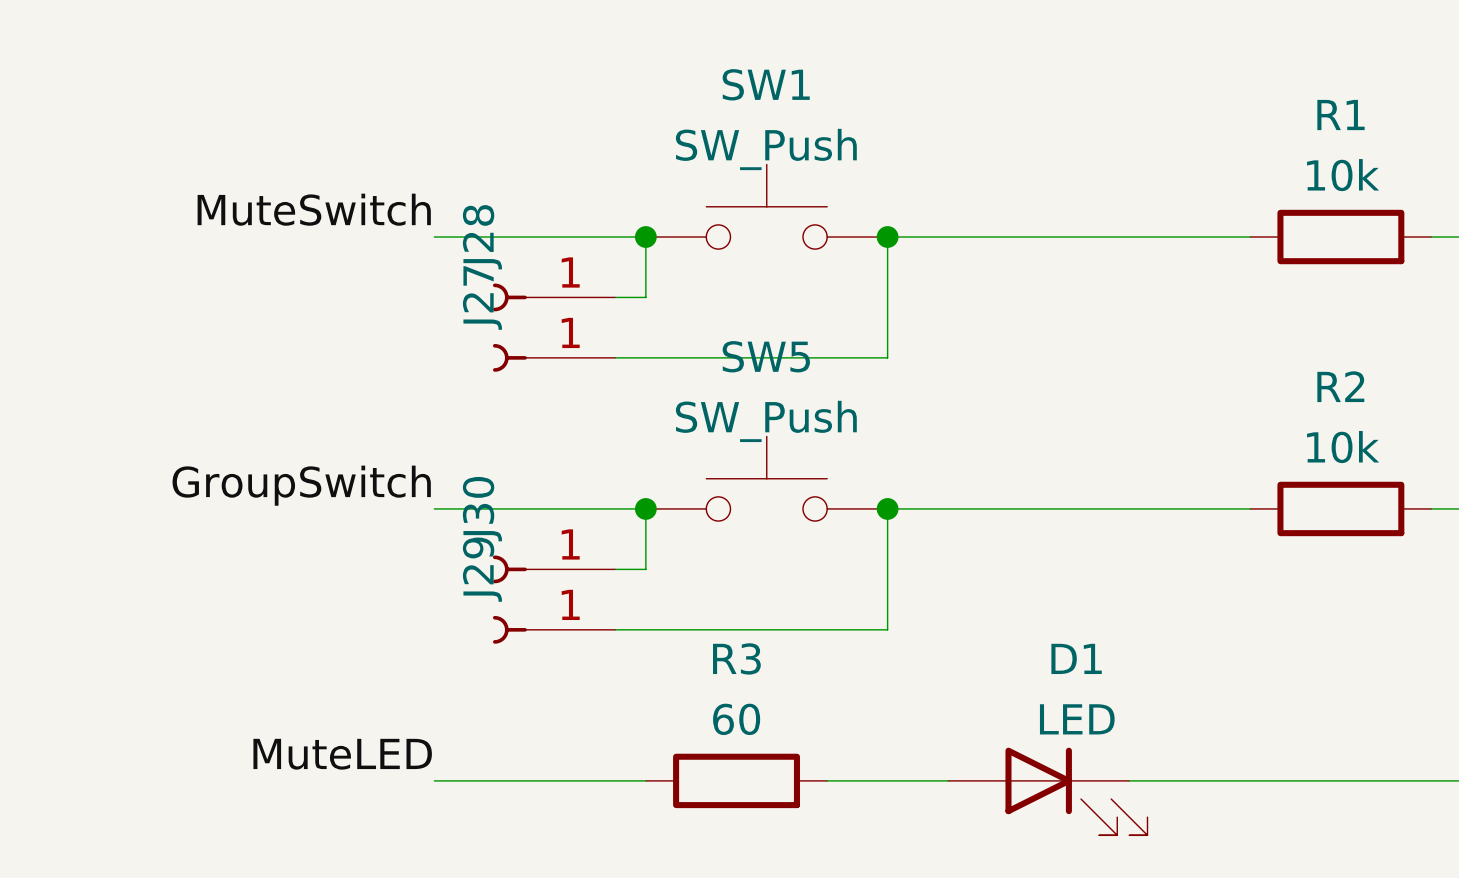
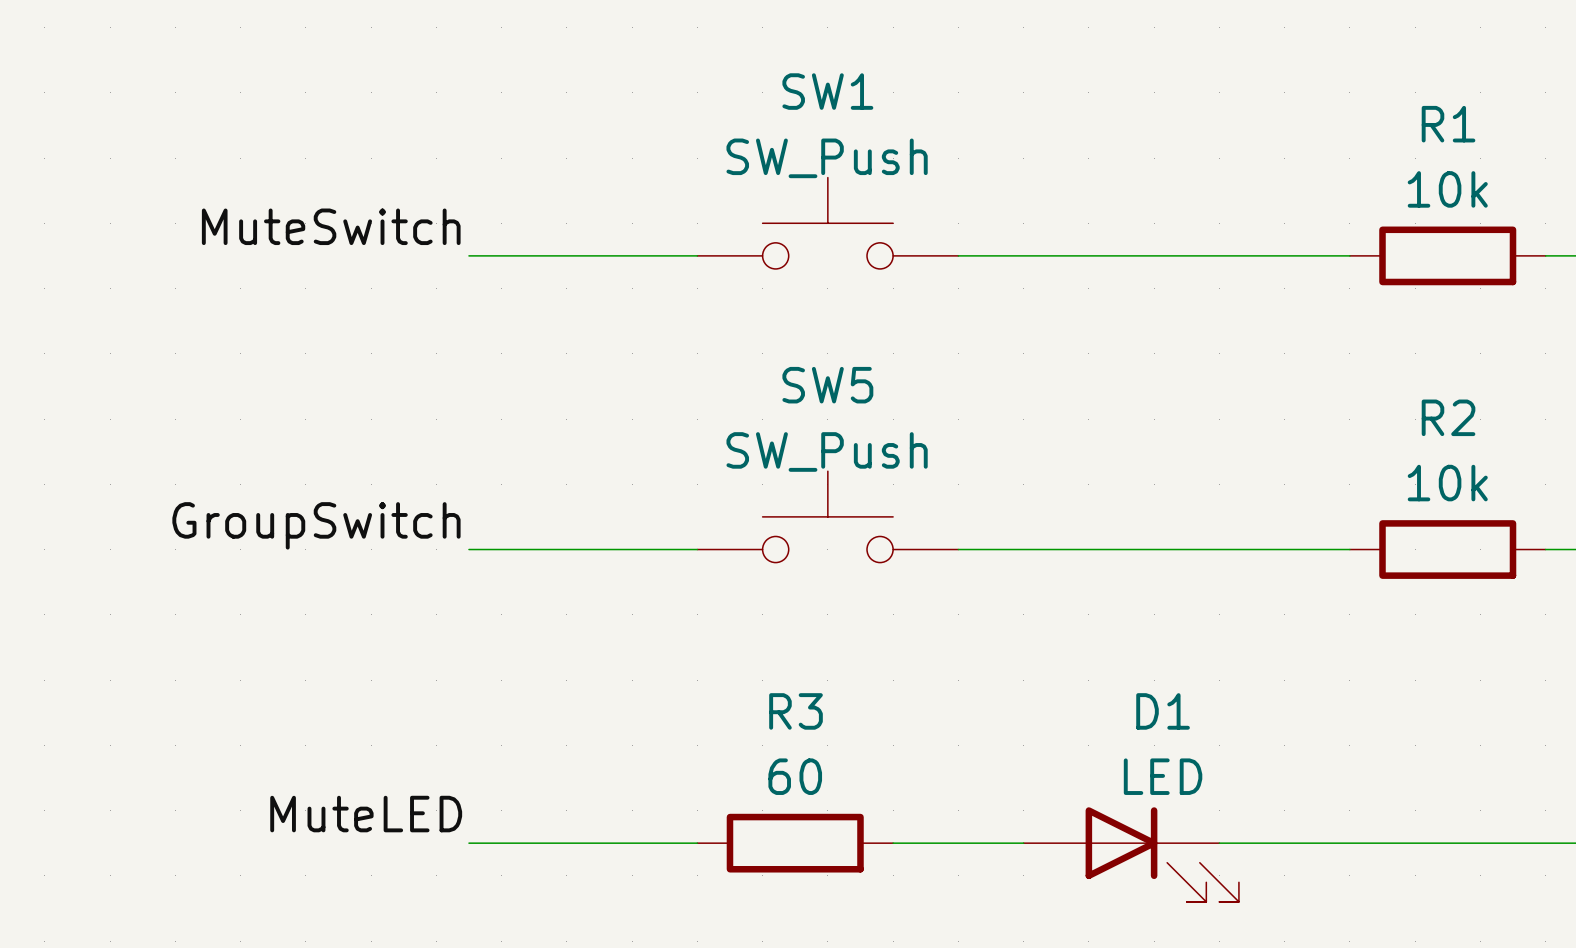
wire: (645, 237) (645, 297) (615, 297) -> none
junction: (645, 237) -> none
wire: (887, 237) (887, 357) (615, 357) -> none
junction: (887, 237) -> none
J28: (554, 297) -> none
J27: (554, 357) -> none
wire: (645, 508) (645, 569) (615, 569) -> none
junction: (645, 508) -> none
wire: (887, 508) (887, 629) (615, 629) -> none
junction: (887, 508) -> none
J30: (554, 569) -> none
J29: (554, 629) -> none

